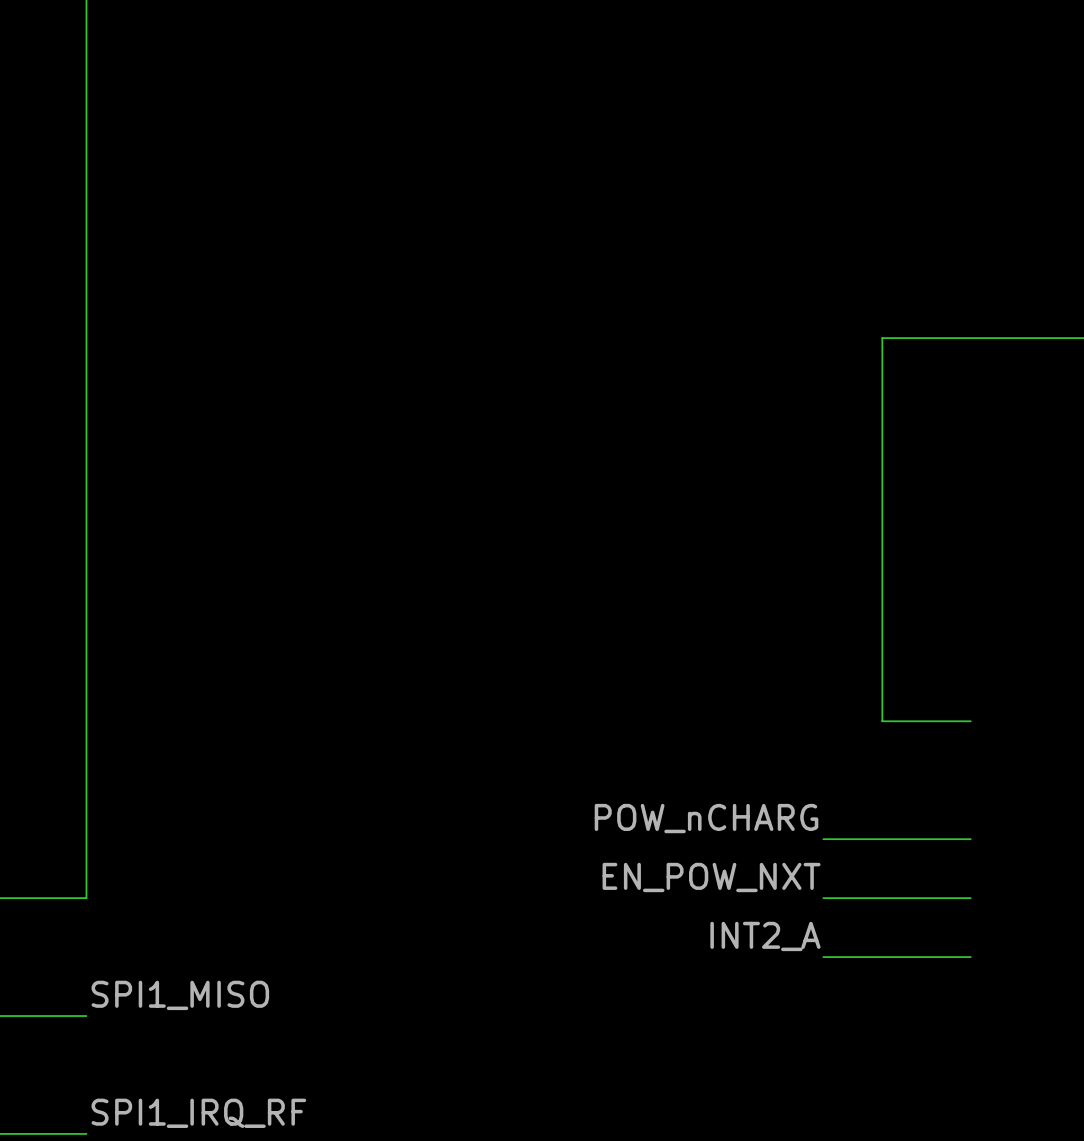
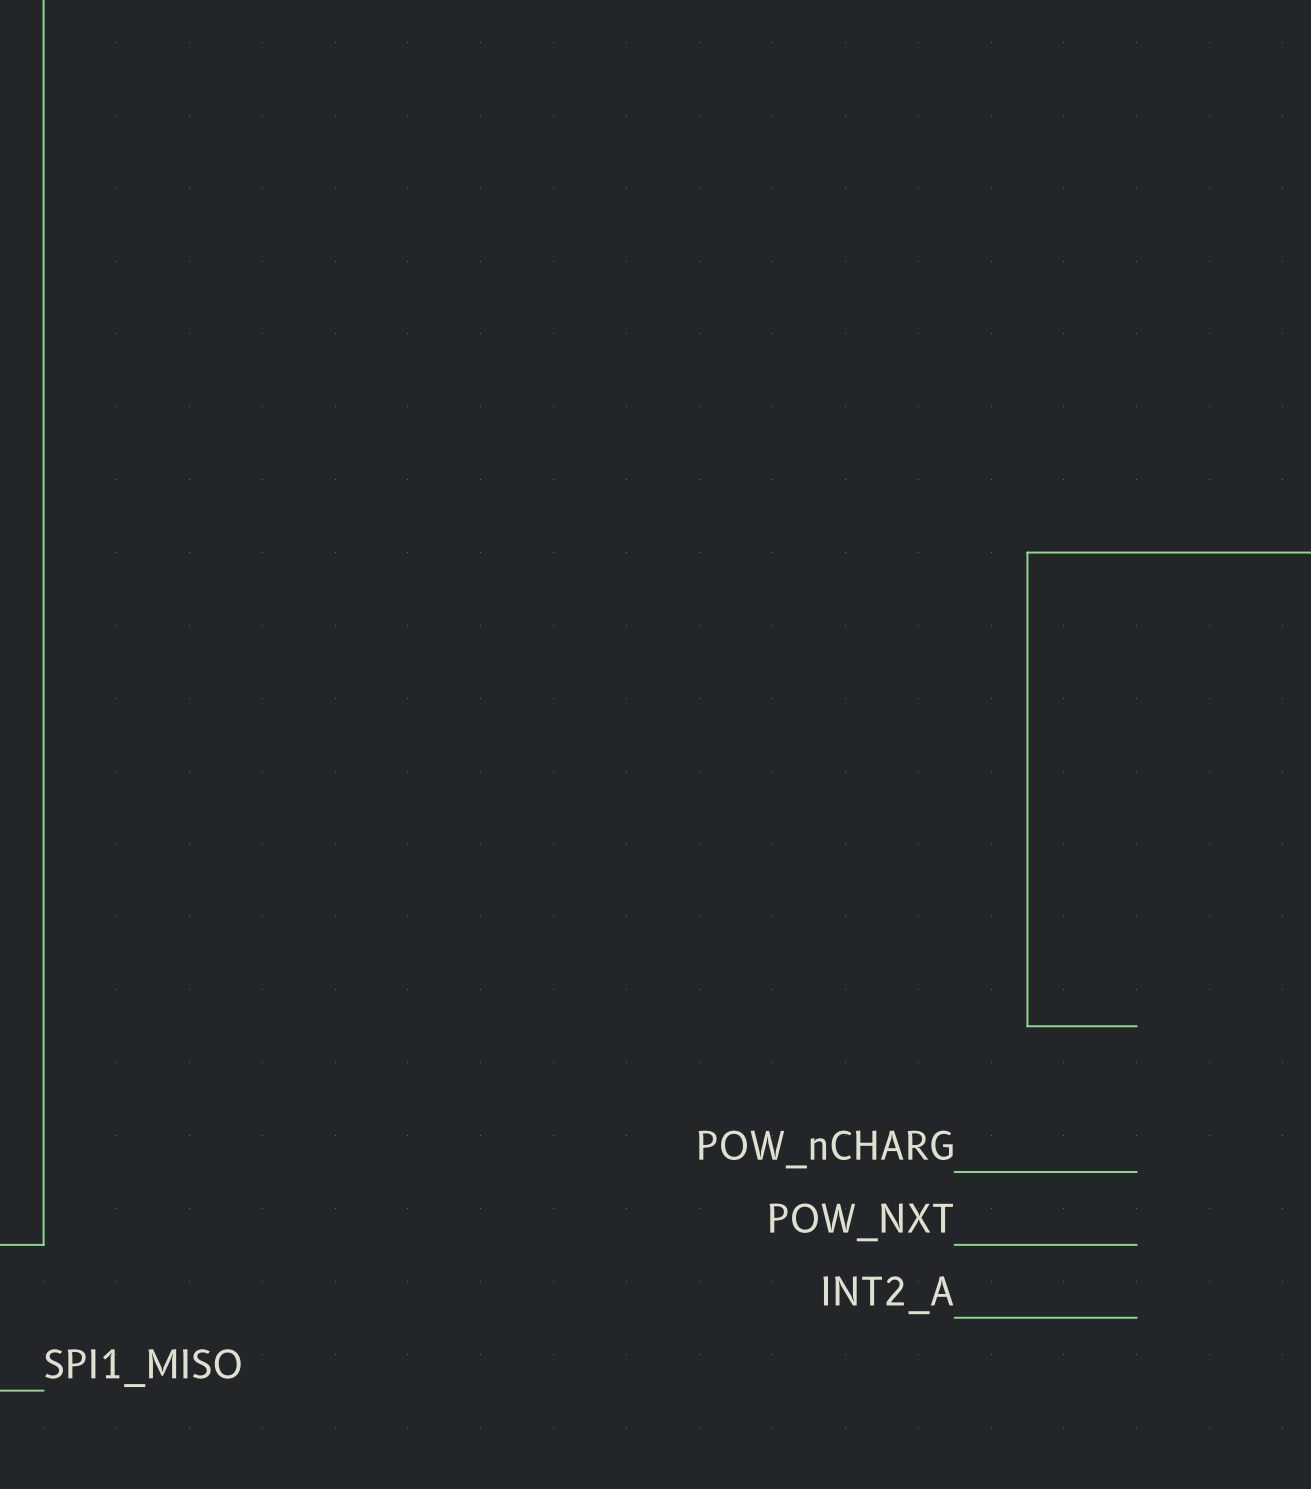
label: EN_POW_NXT (711, 877) -> POW_NXT (861, 1222)

